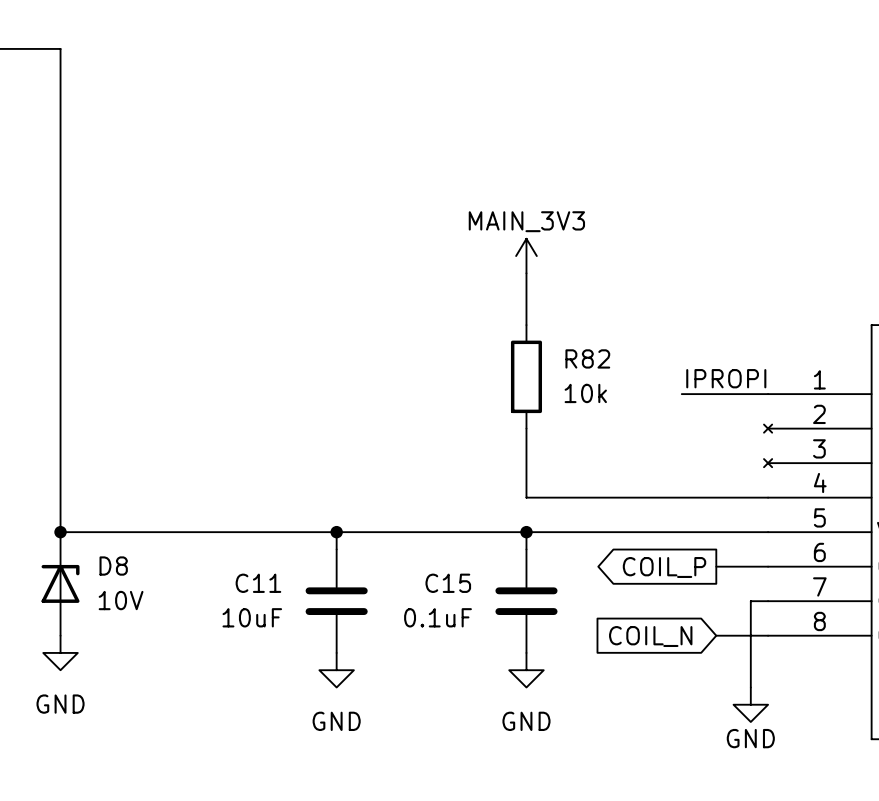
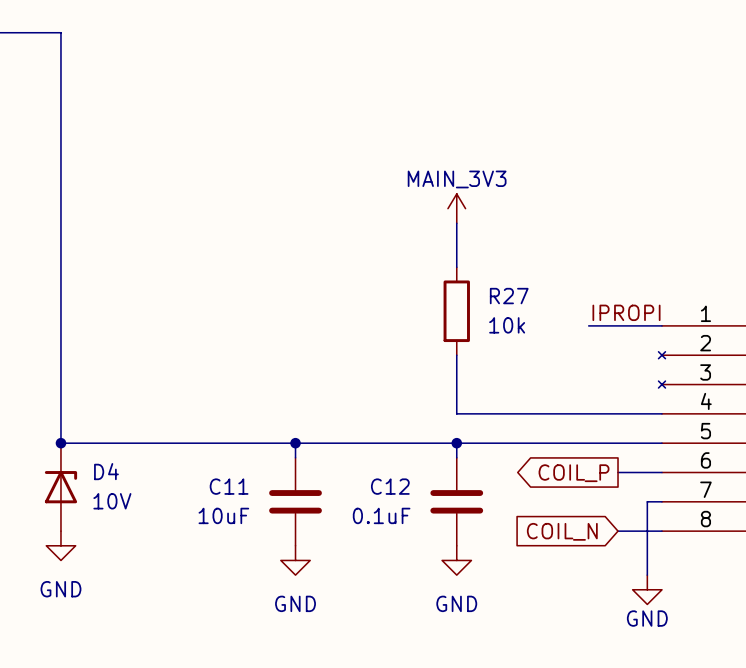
R82 name: R82 (587, 358) -> R27 (509, 296)
D8 name: D8 (113, 566) -> D4 (106, 471)
C15 name: C15 (448, 583) -> C12 (390, 486)

